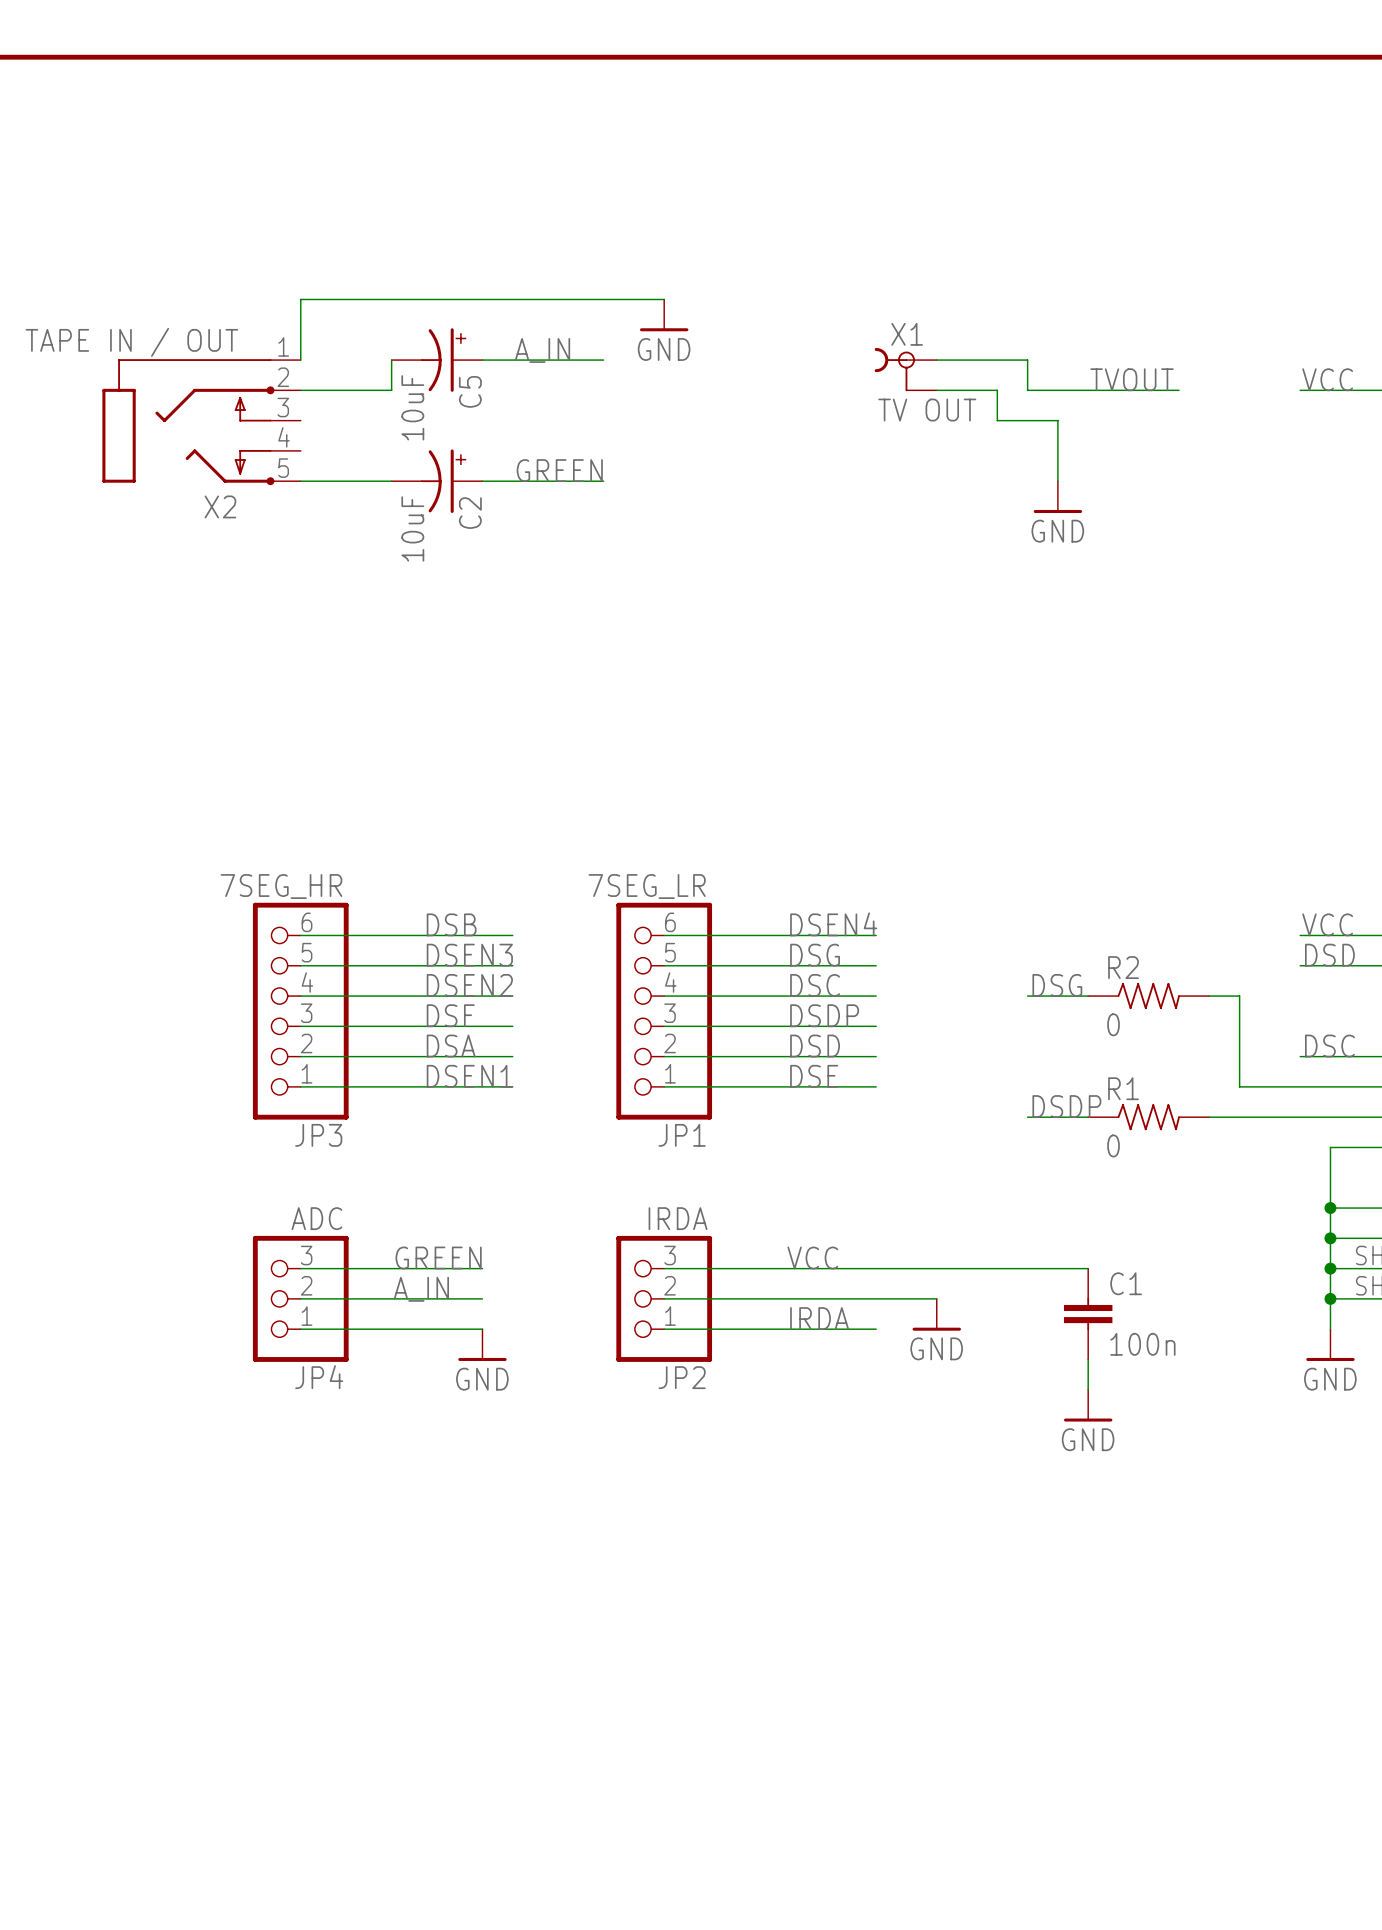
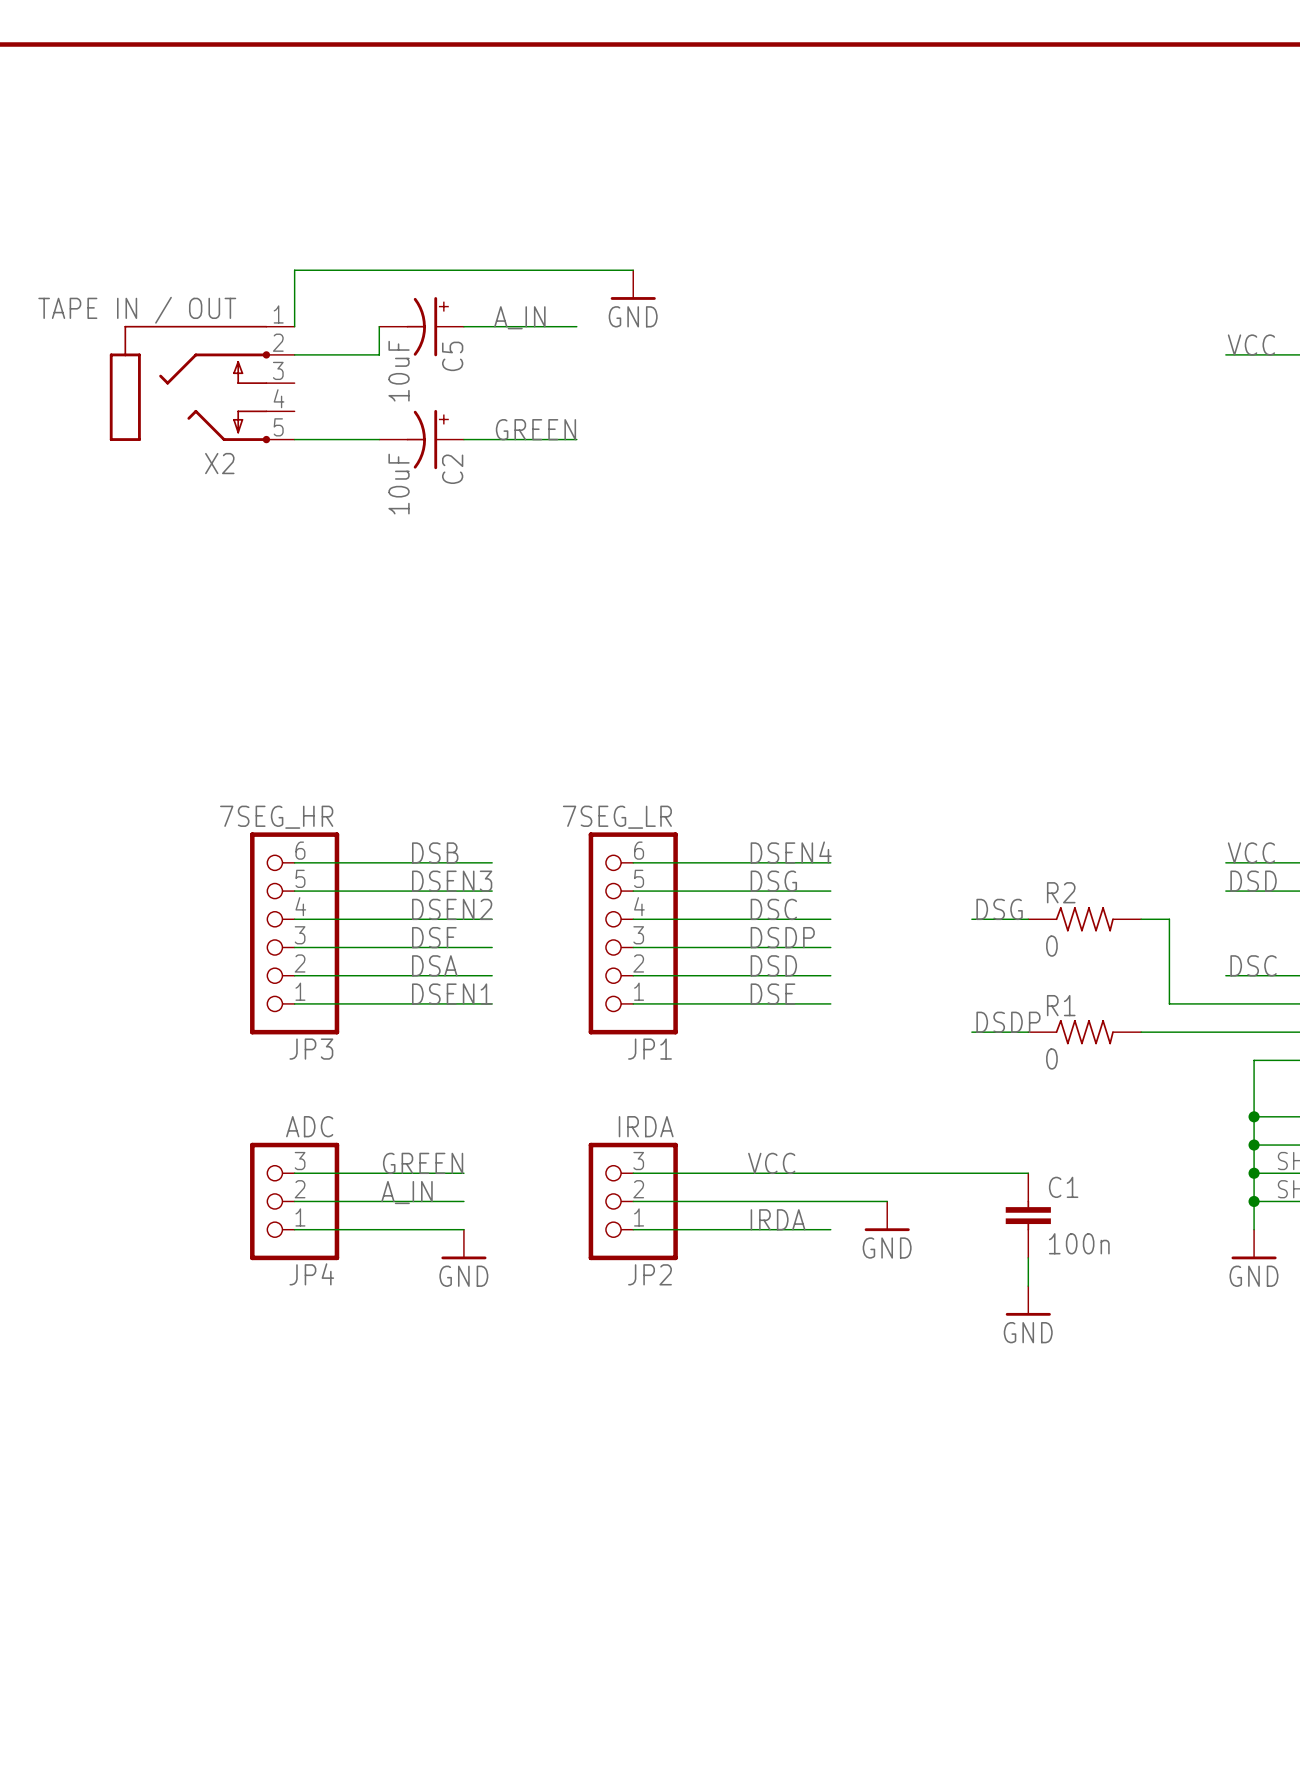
wire: (936, 360) (1027, 360) (1027, 390) (1179, 390) -> none
X1: TV OUT (905, 369) -> none
label: TVOUT (1132, 379) -> none
wire: (936, 390) (997, 390) (997, 420) (1057, 420) (1057, 481) -> none
power symbol: GND (1057, 497) -> none

